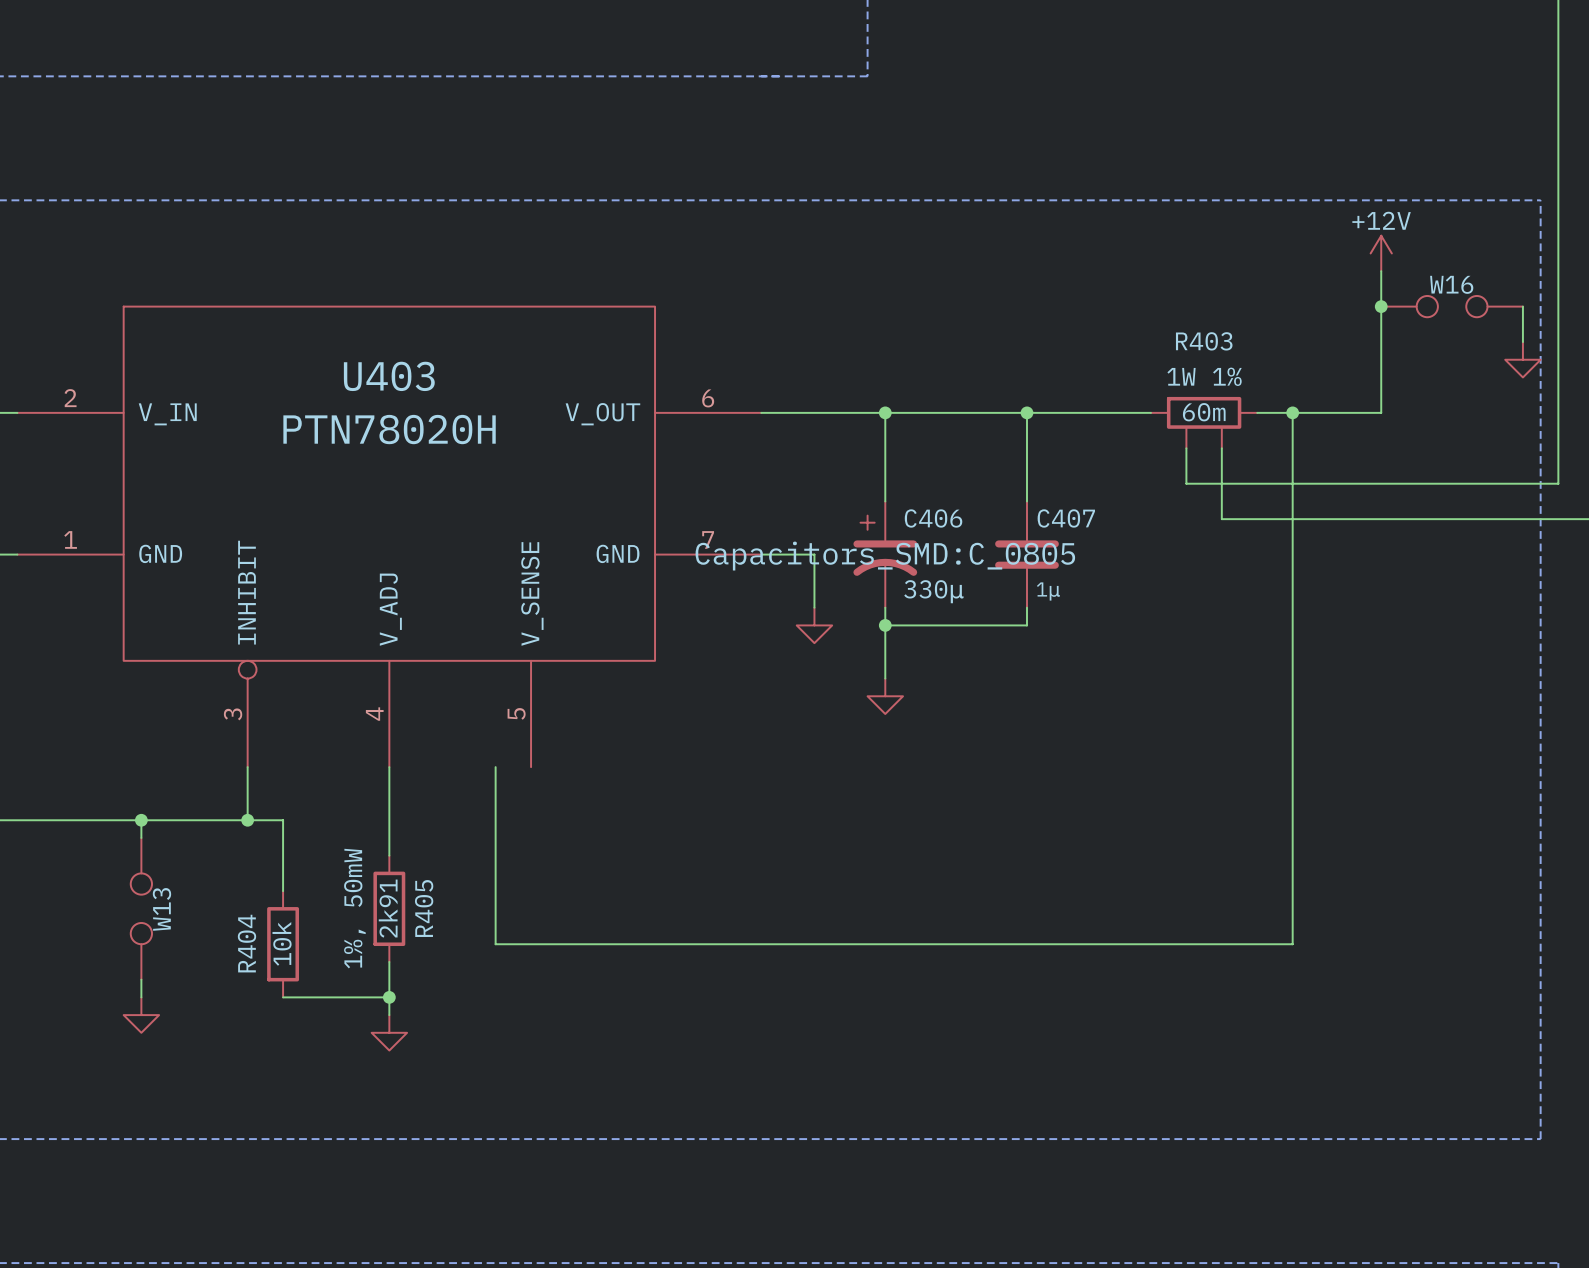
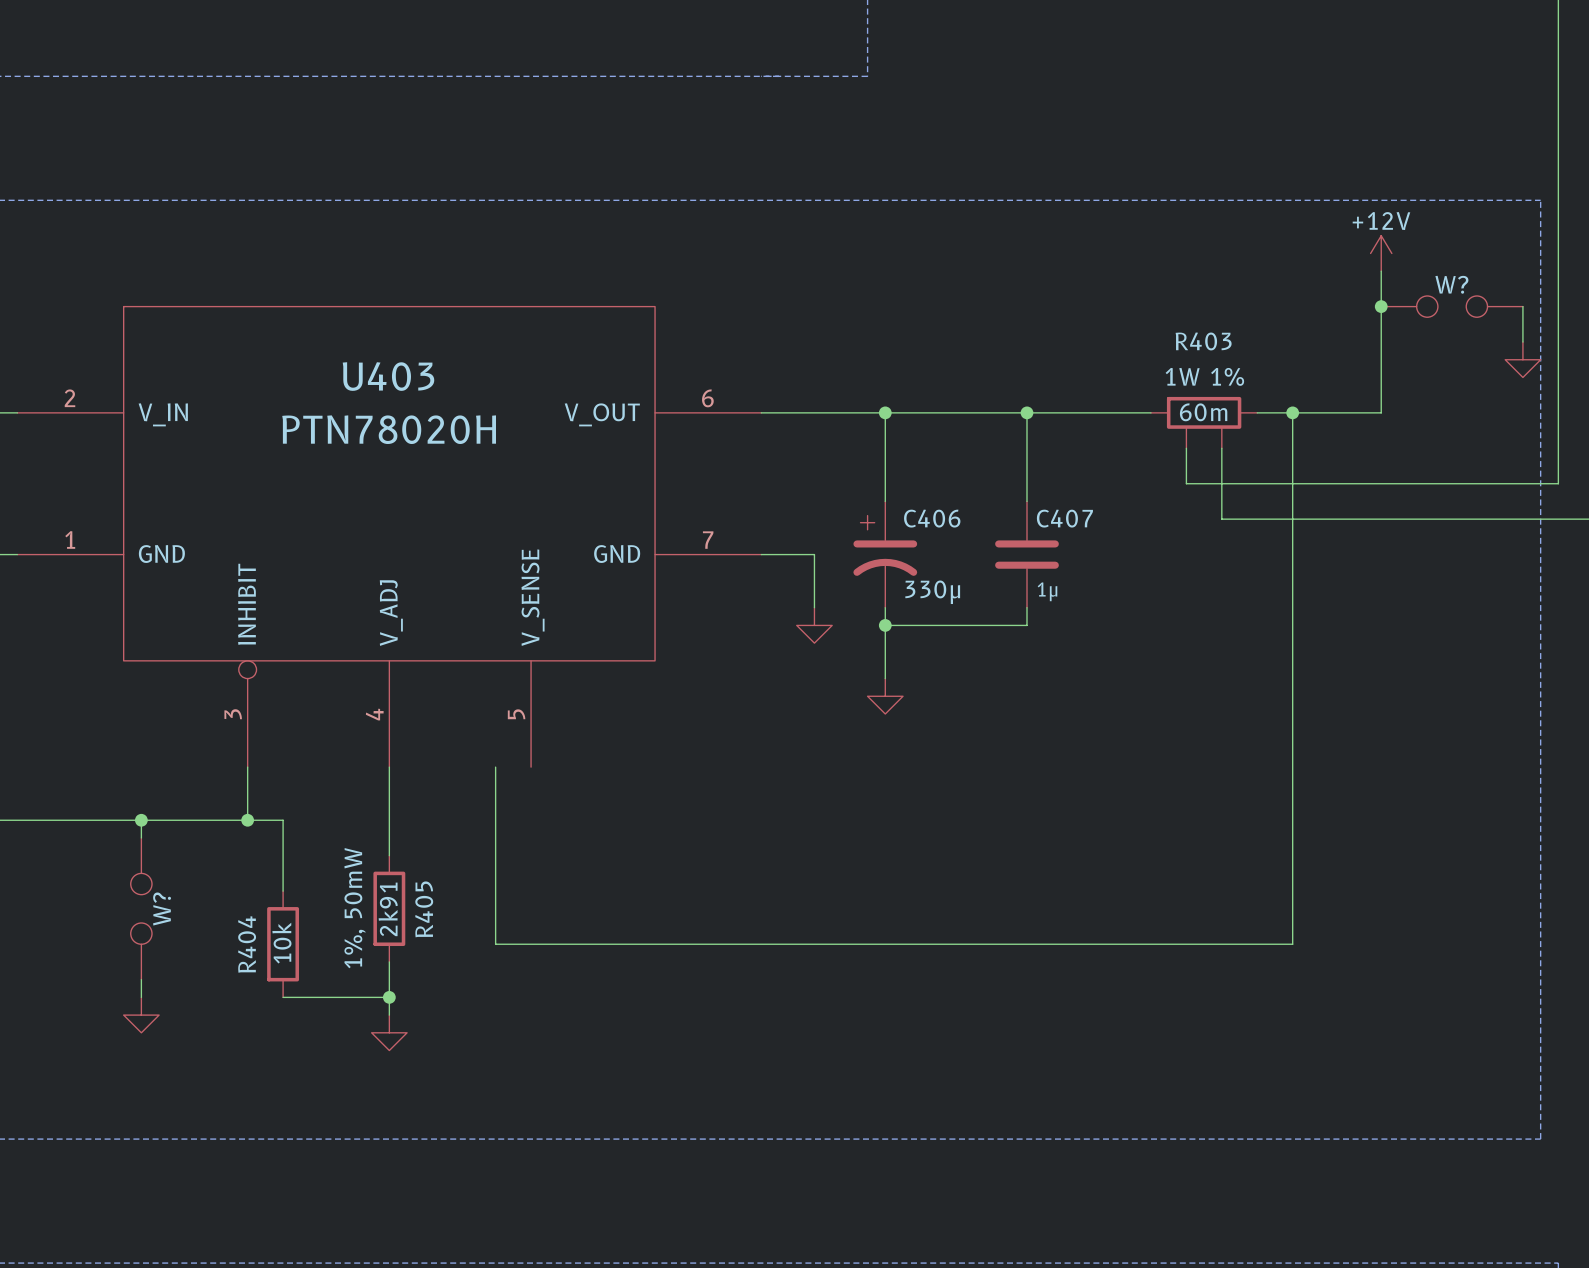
W16 name: W16 (1451, 284) -> W? (1451, 284)
C406 text: Capacitors_SMD:C_0805 (885, 556) -> none
W13 name: W13 (161, 909) -> W? (162, 909)

